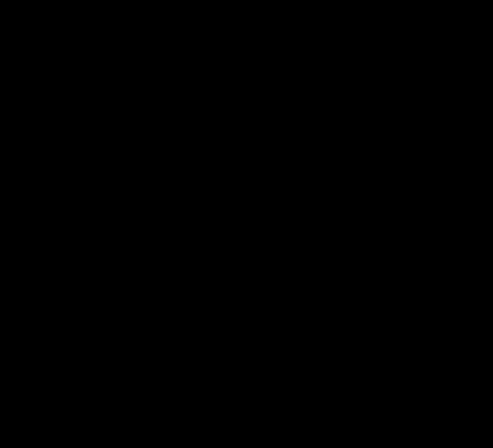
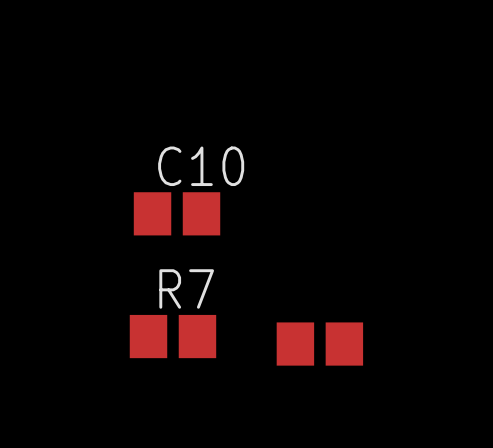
C10: none -> (177, 213)
R7: none -> (172, 336)
part: none -> (319, 344)

